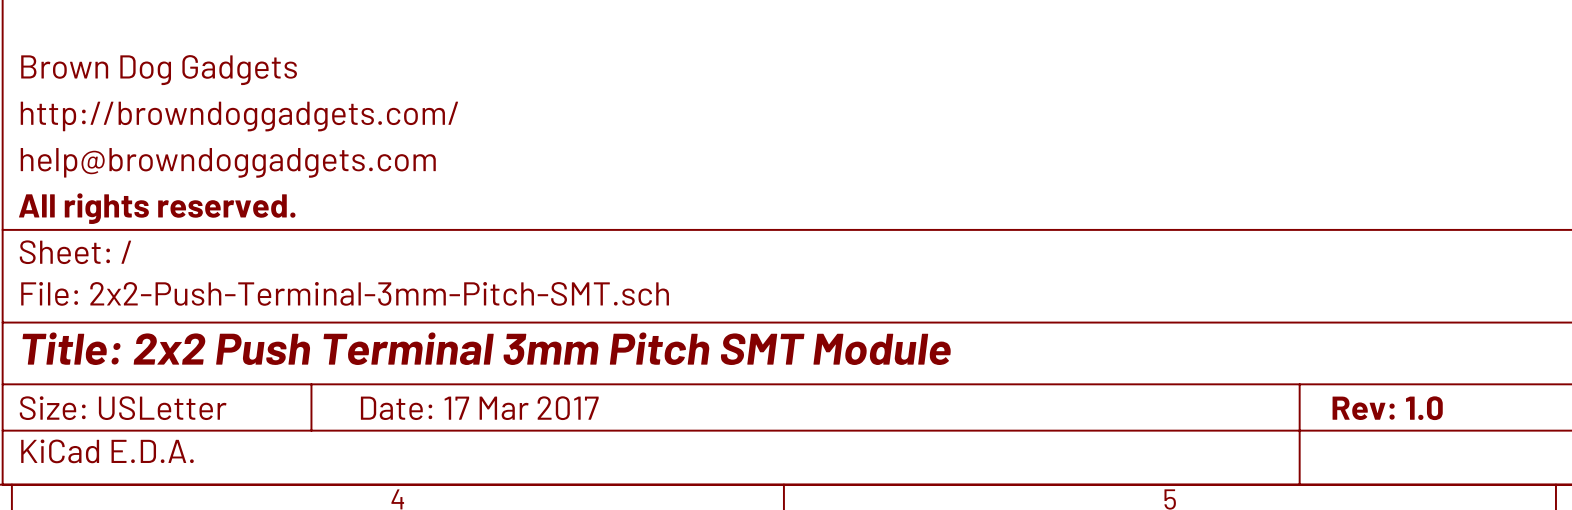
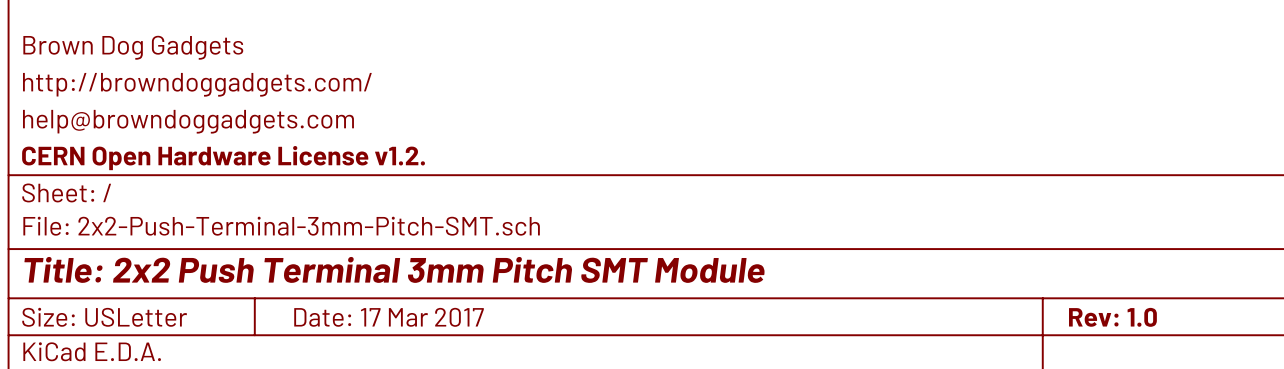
title block: All rights reserved. (157, 208) -> CERN Open Hardware License v1.2. (223, 158)

